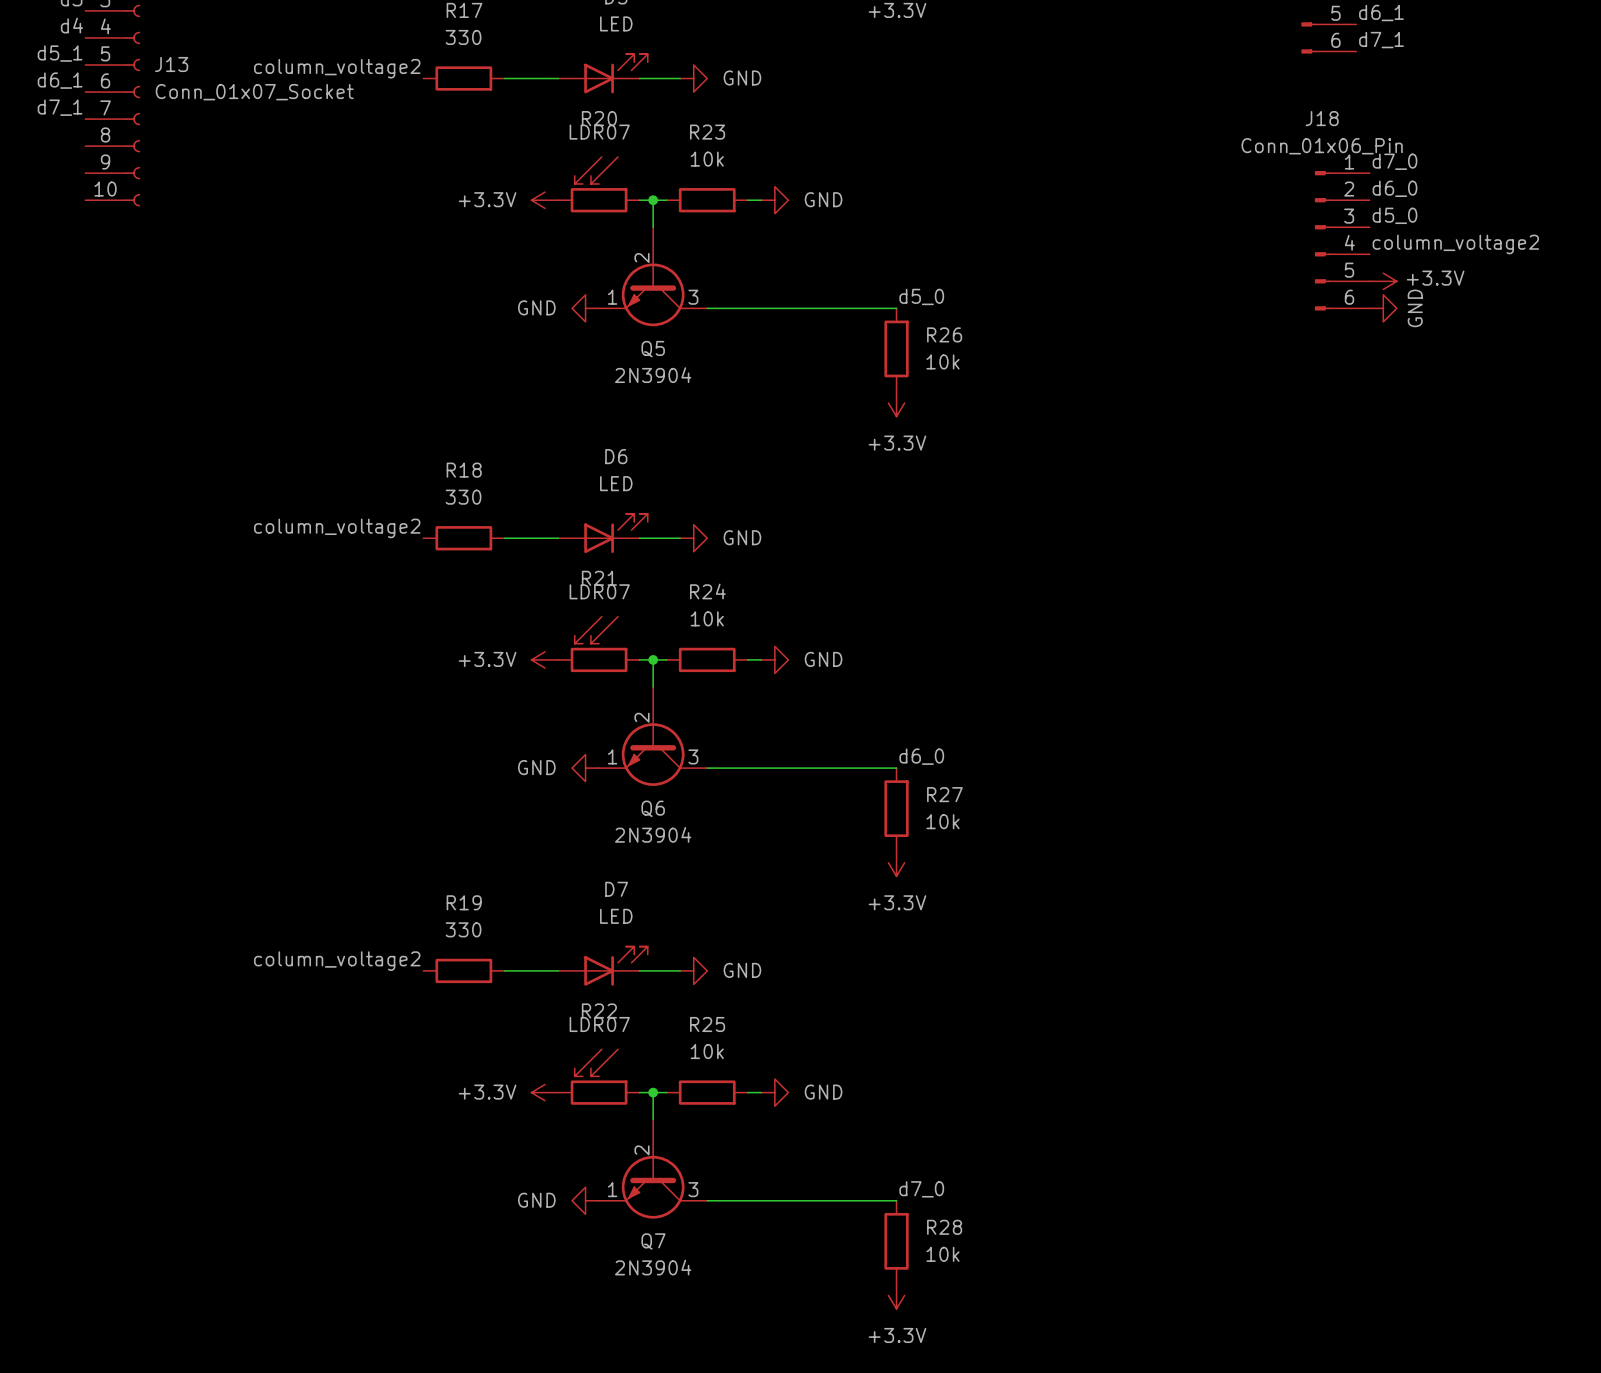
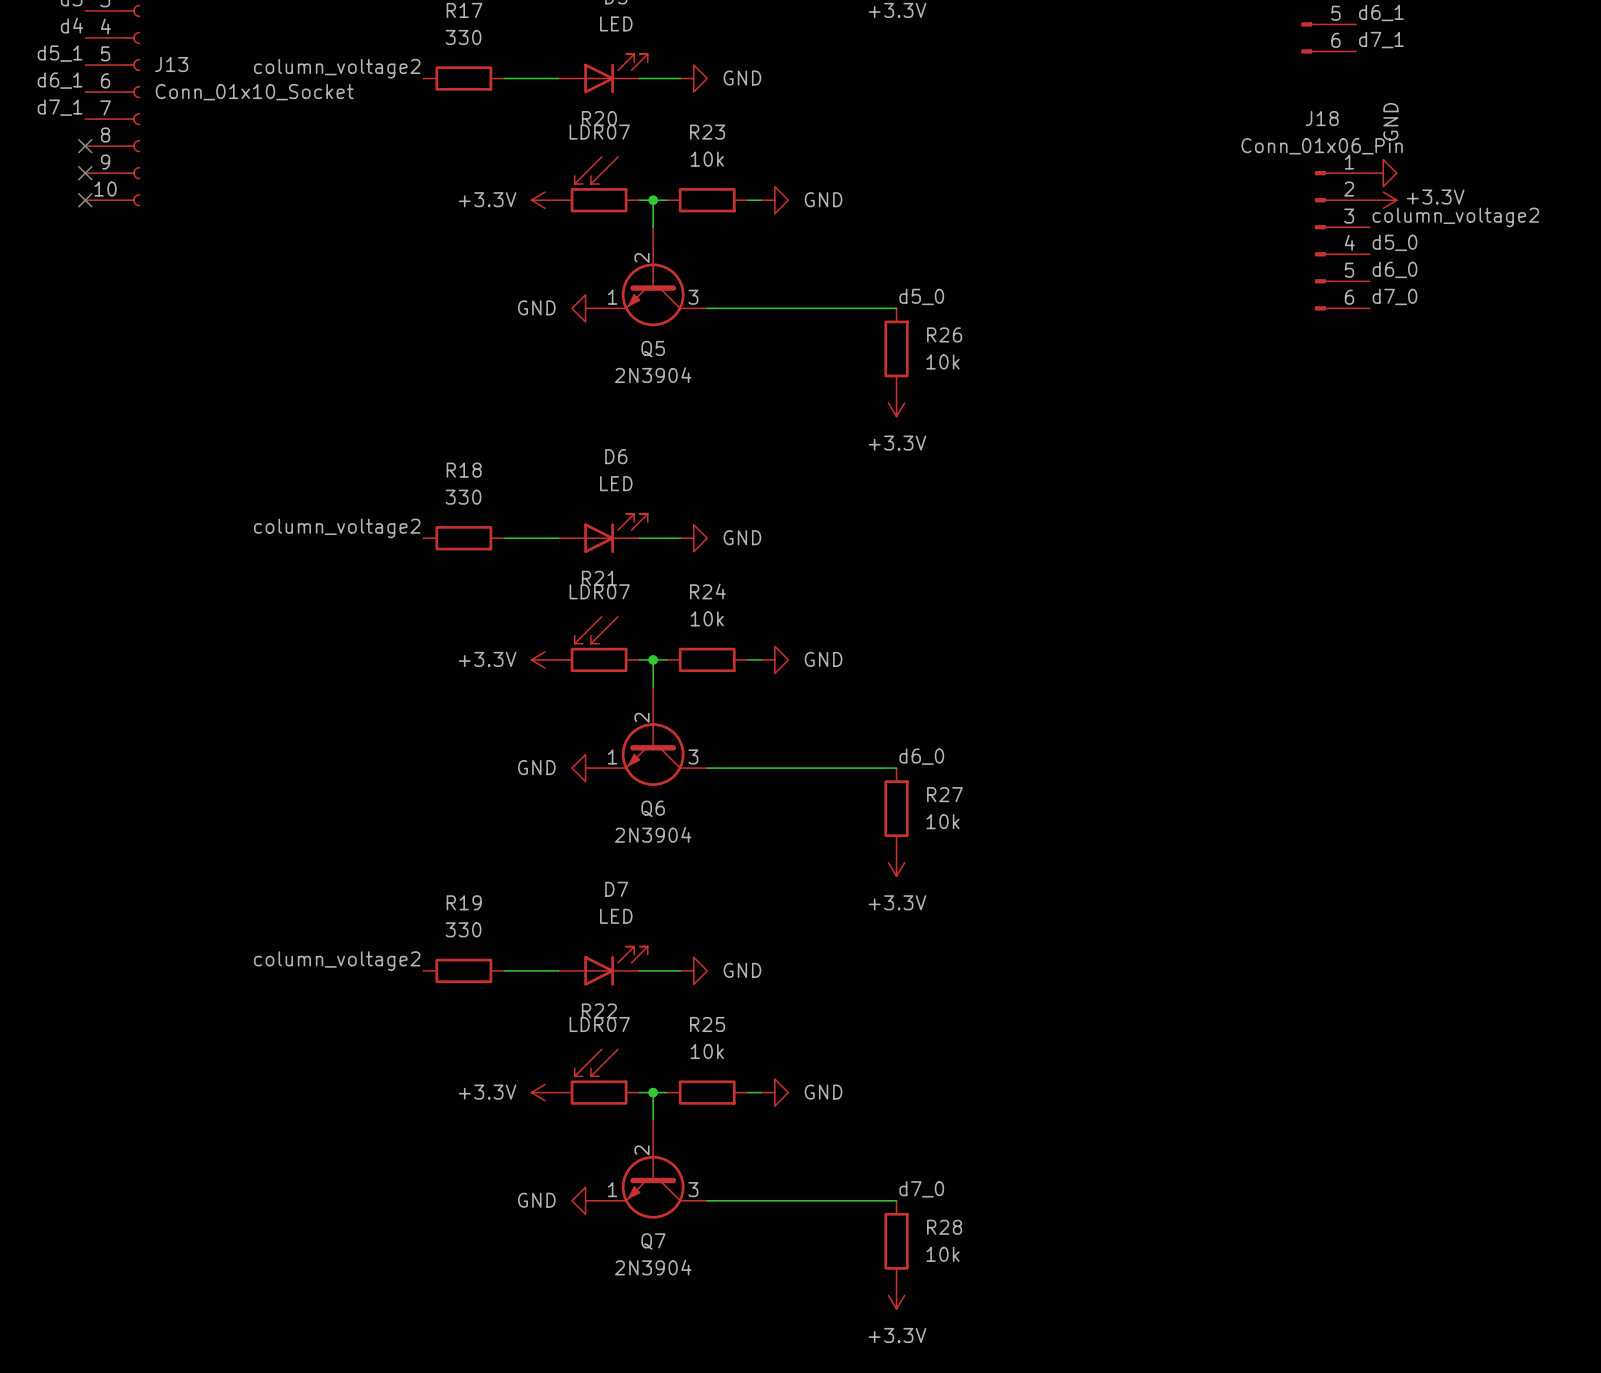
J13 value: Conn_01x07_Socket (254, 92) -> Conn_01x10_Socket (254, 92)
no-connect mark: none -> (85, 146)
label position: d7_0 (1394, 161) -> d7_0 (1394, 296)
no-connect mark: none -> (85, 173)
label position: d6_0 (1394, 188) -> d6_0 (1394, 269)
no-connect mark: none -> (85, 200)
label: d5_0 (1394, 215) -> column_voltage2 (1455, 217)
label: column_voltage2 (1455, 244) -> d5_0 (1394, 242)
power symbol position: +3.3V (1383, 281) -> +3.3V (1383, 200)
power symbol position: GND (1383, 308) -> GND (1383, 173)
power symbol text position: GND (1415, 308) -> GND (1390, 121)

